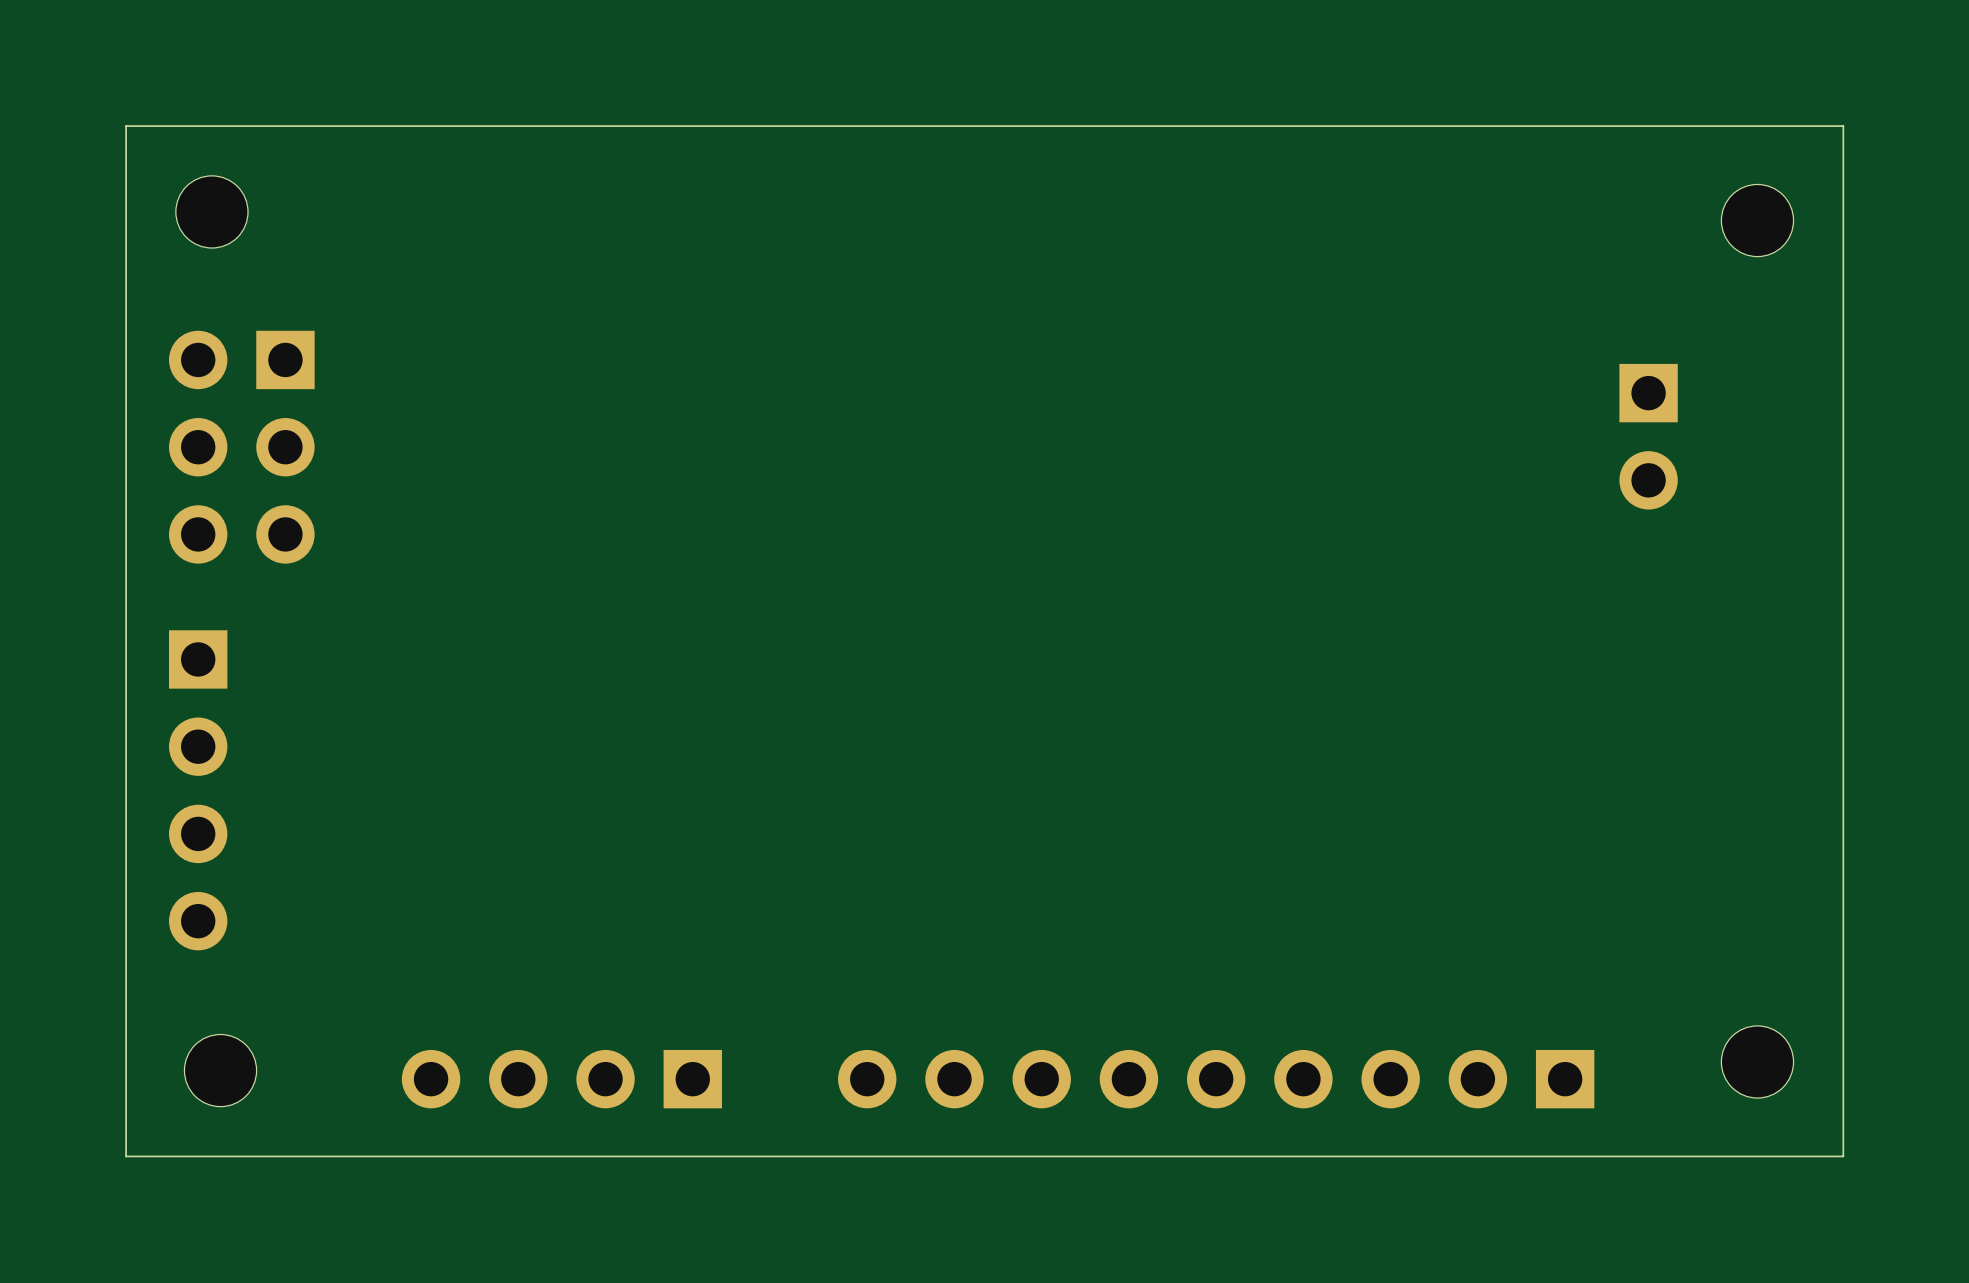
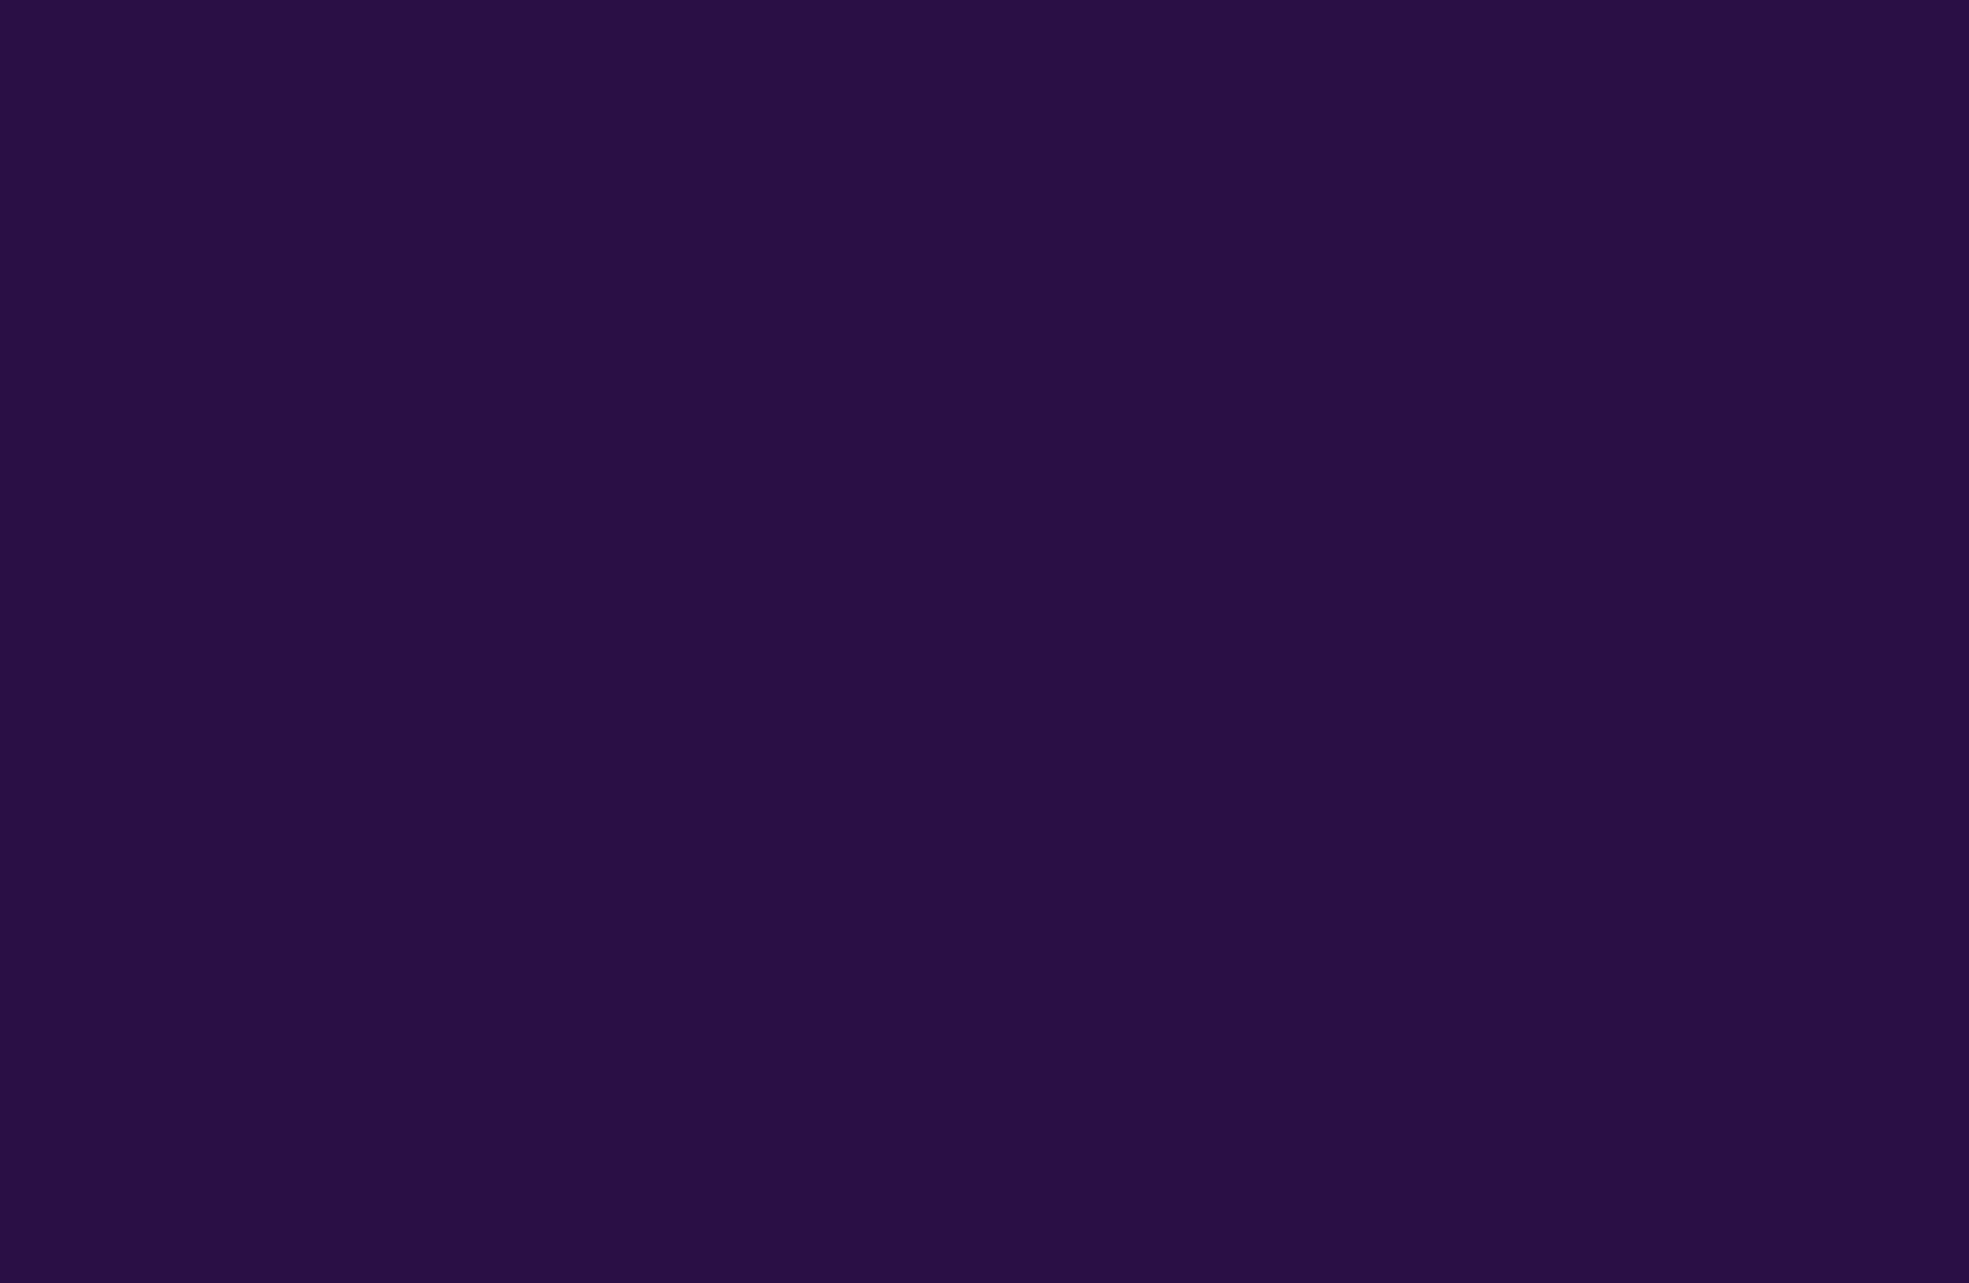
board edge: (1843, 126) (126, 126) (126, 1156) (1843, 1156) (1843, 126) -> none
part: (211, 211) -> none
part: (1757, 220) -> none
part: (1648, 436) -> none
part: (241, 447) -> none
part: (198, 790) -> none
part: (1757, 1061) -> none
part: (220, 1070) -> none
part: (561, 1079) -> none
part: (1216, 1079) -> none

